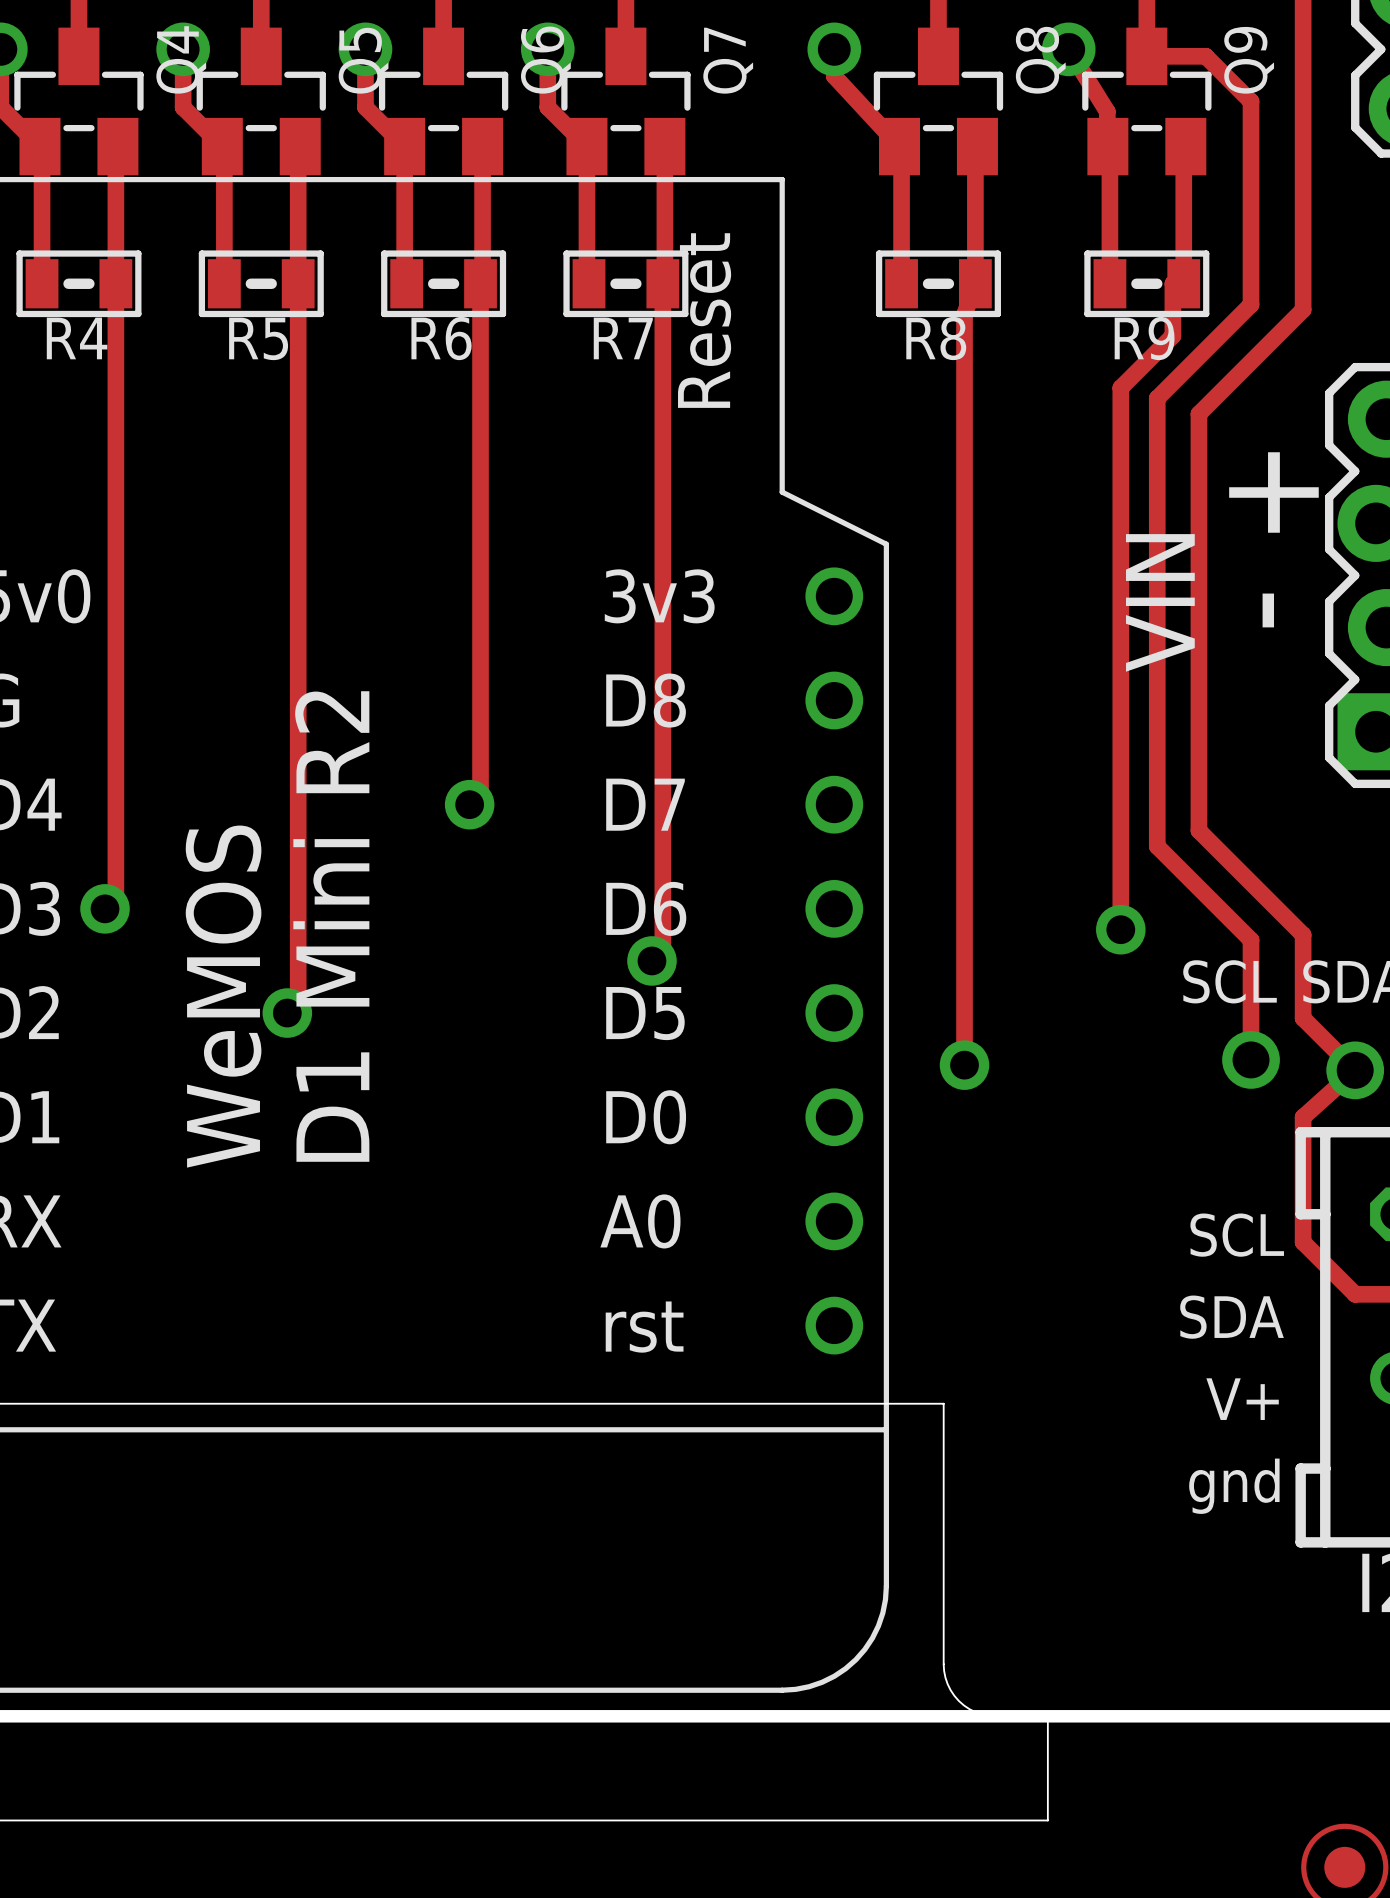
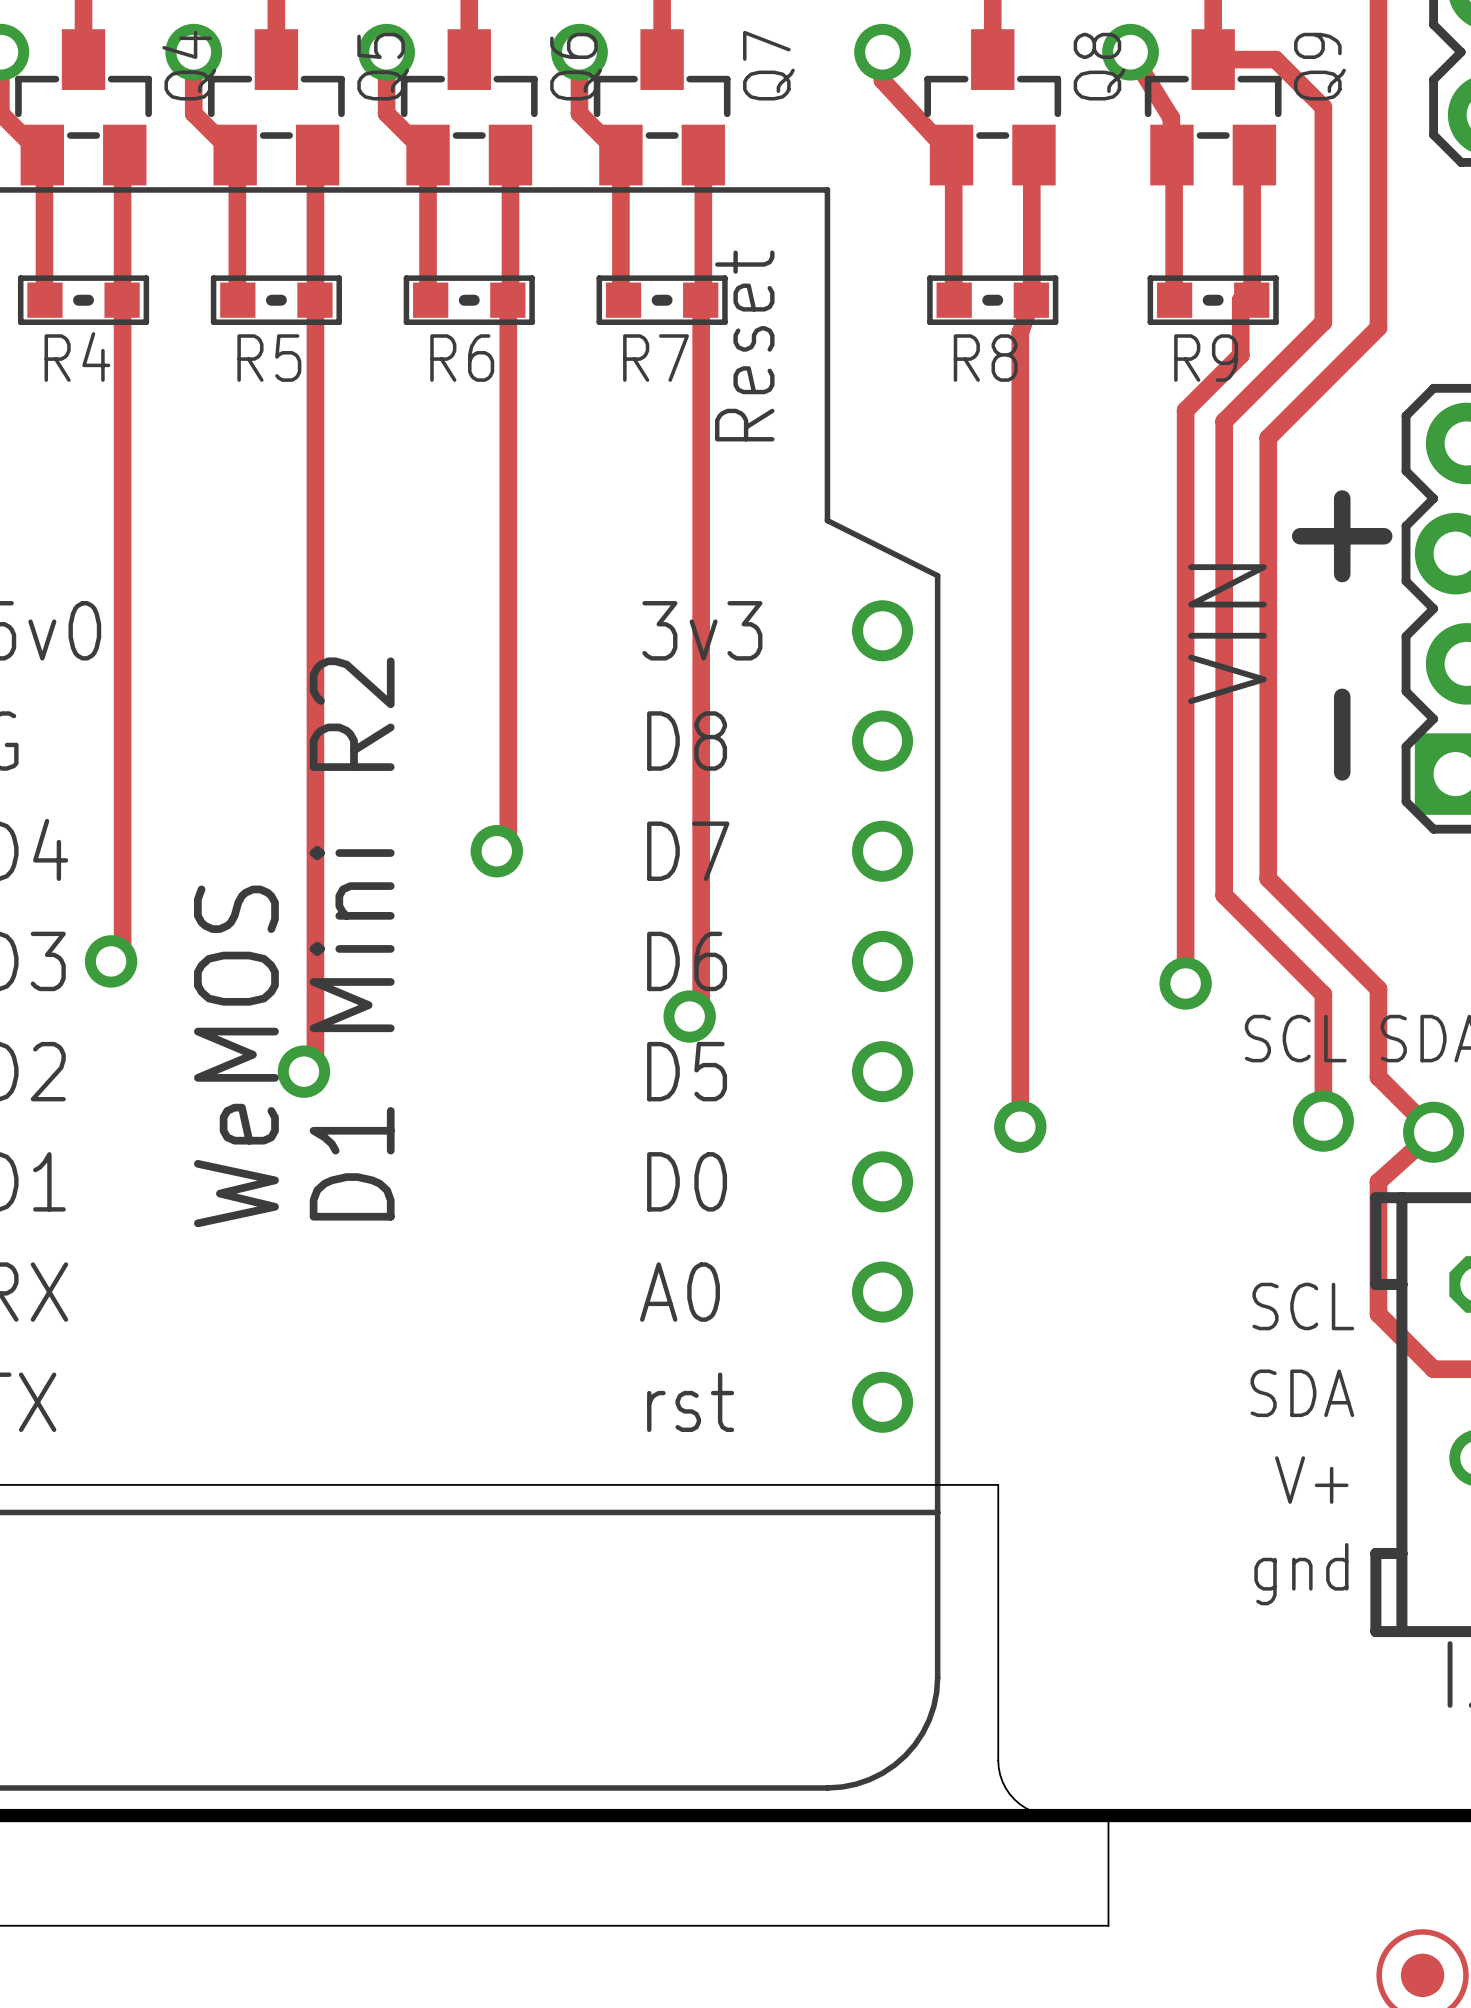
R4 footprint: [16, 250, 142, 318] -> [17, 275, 150, 325]
R5 footprint: [198, 250, 324, 318] -> [210, 275, 342, 325]
R6 footprint: [381, 250, 507, 318] -> [403, 275, 535, 325]
R7 footprint: [563, 250, 689, 318] -> [596, 275, 728, 325]
R8 footprint: [875, 250, 1001, 318] -> [927, 275, 1059, 325]
R9 footprint: [1084, 250, 1210, 318] -> [1147, 275, 1279, 325]

